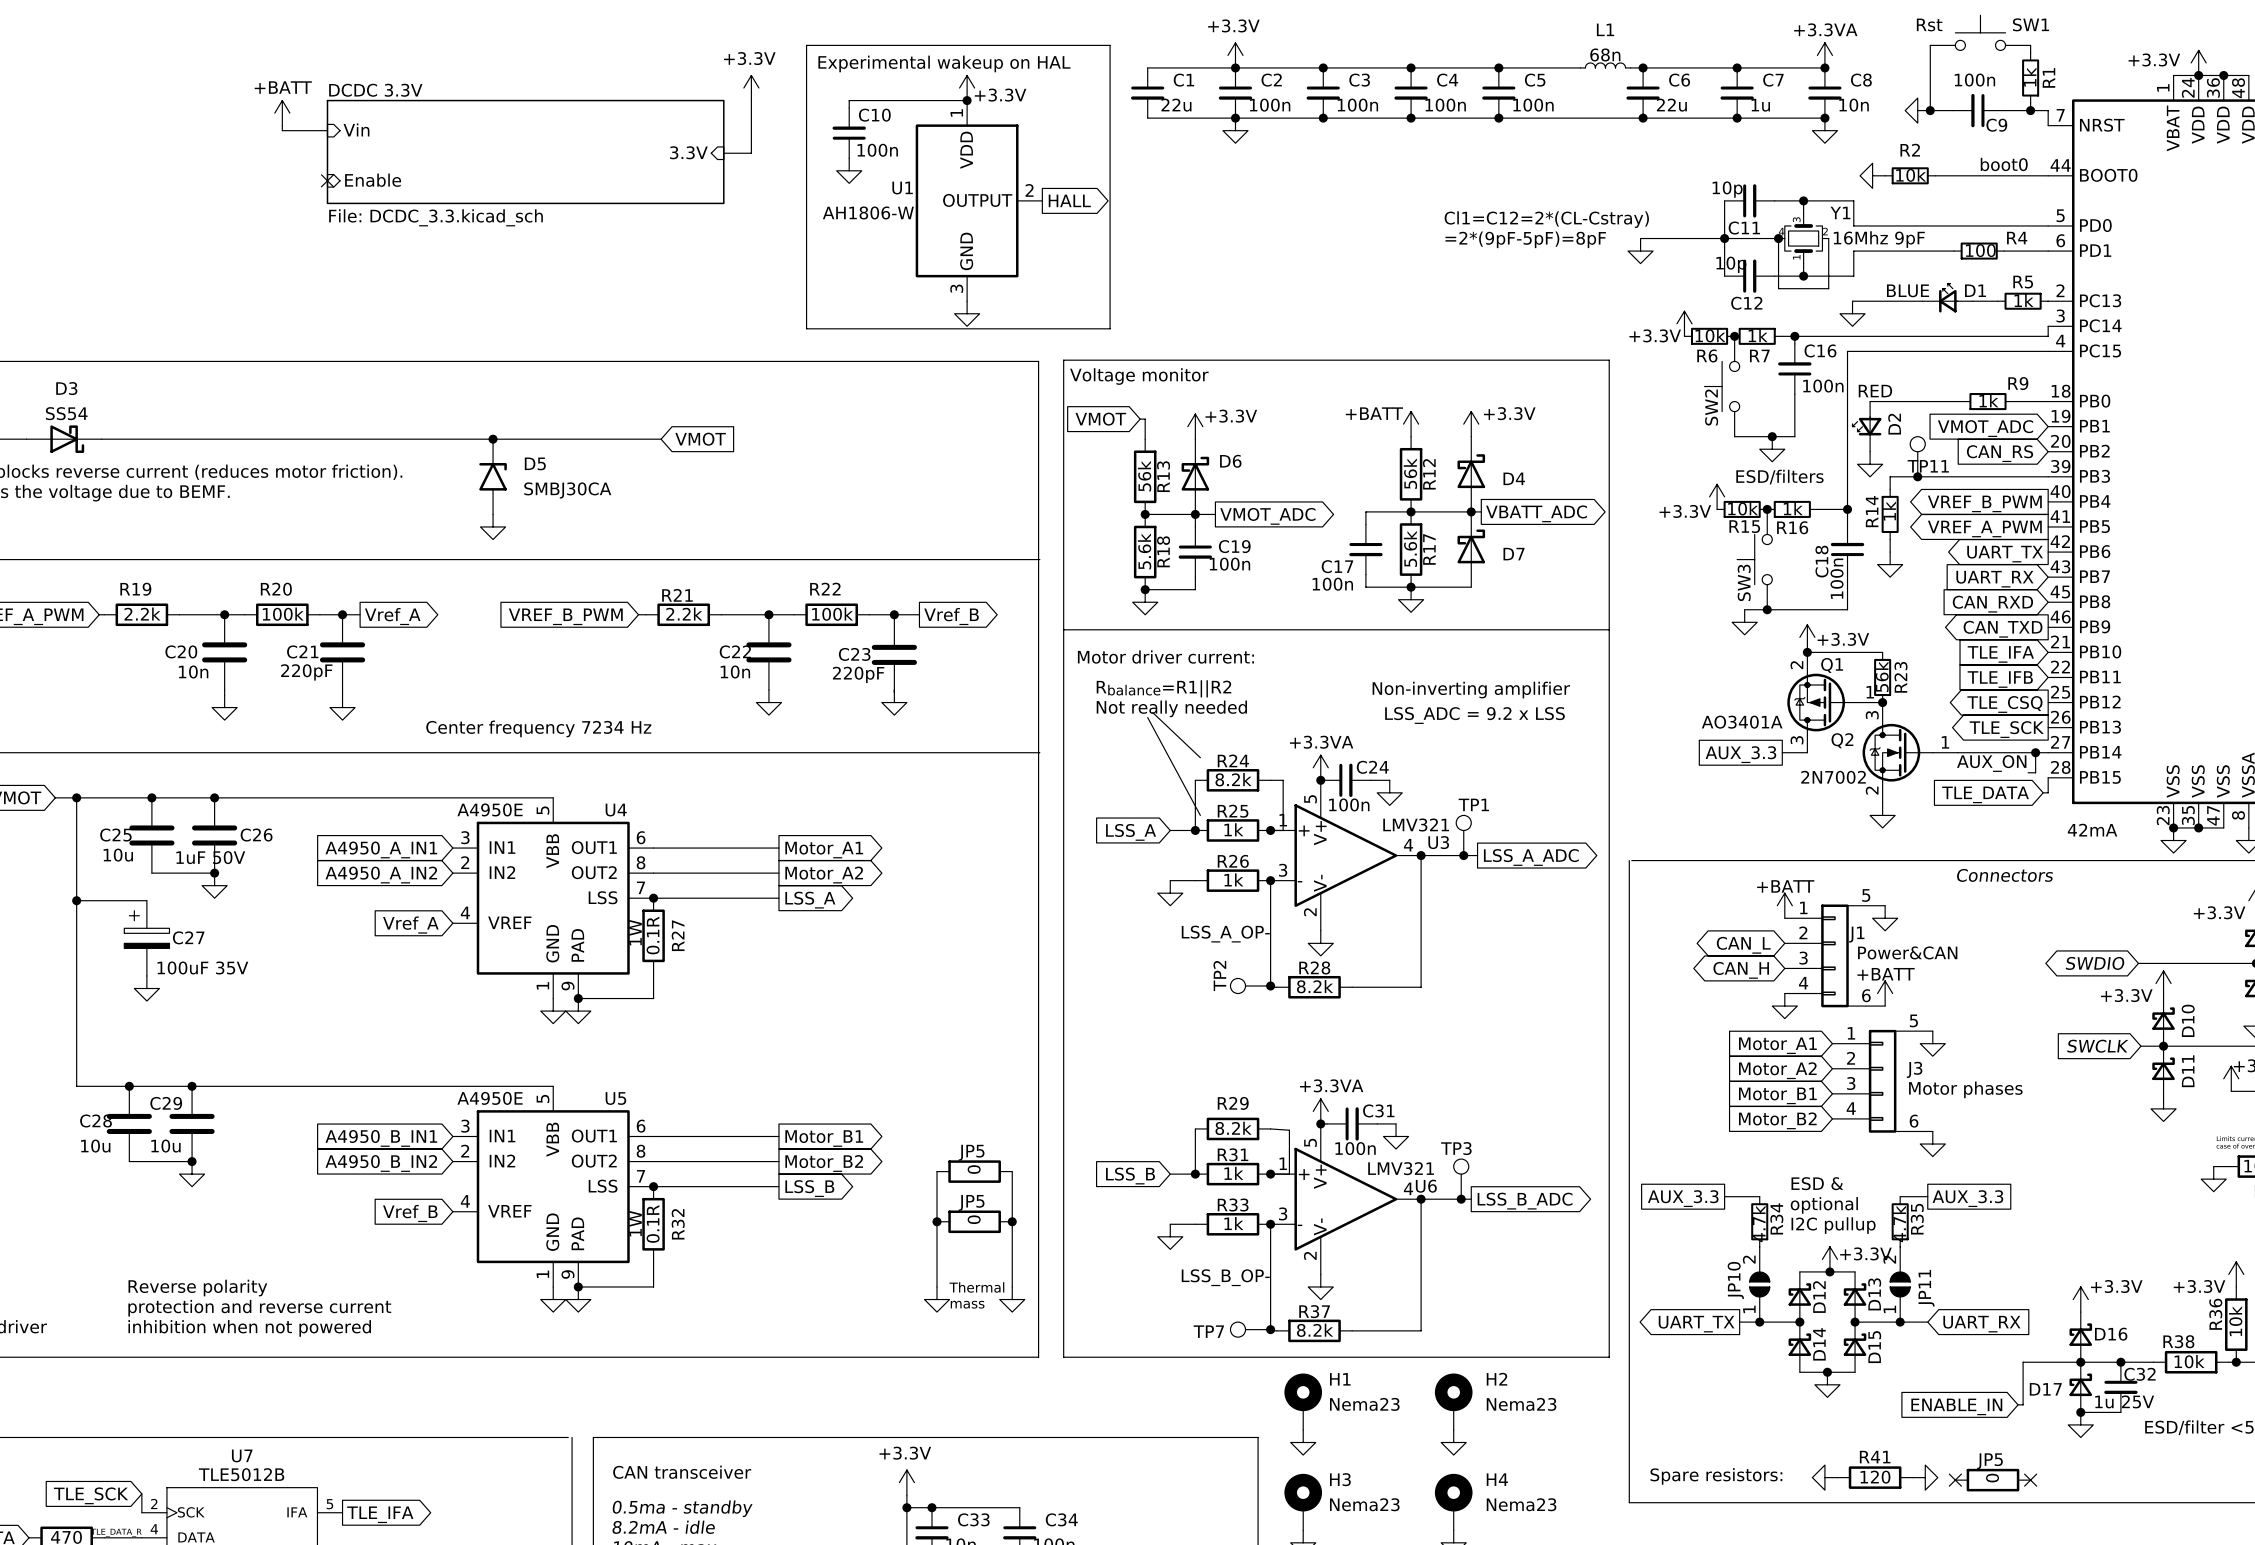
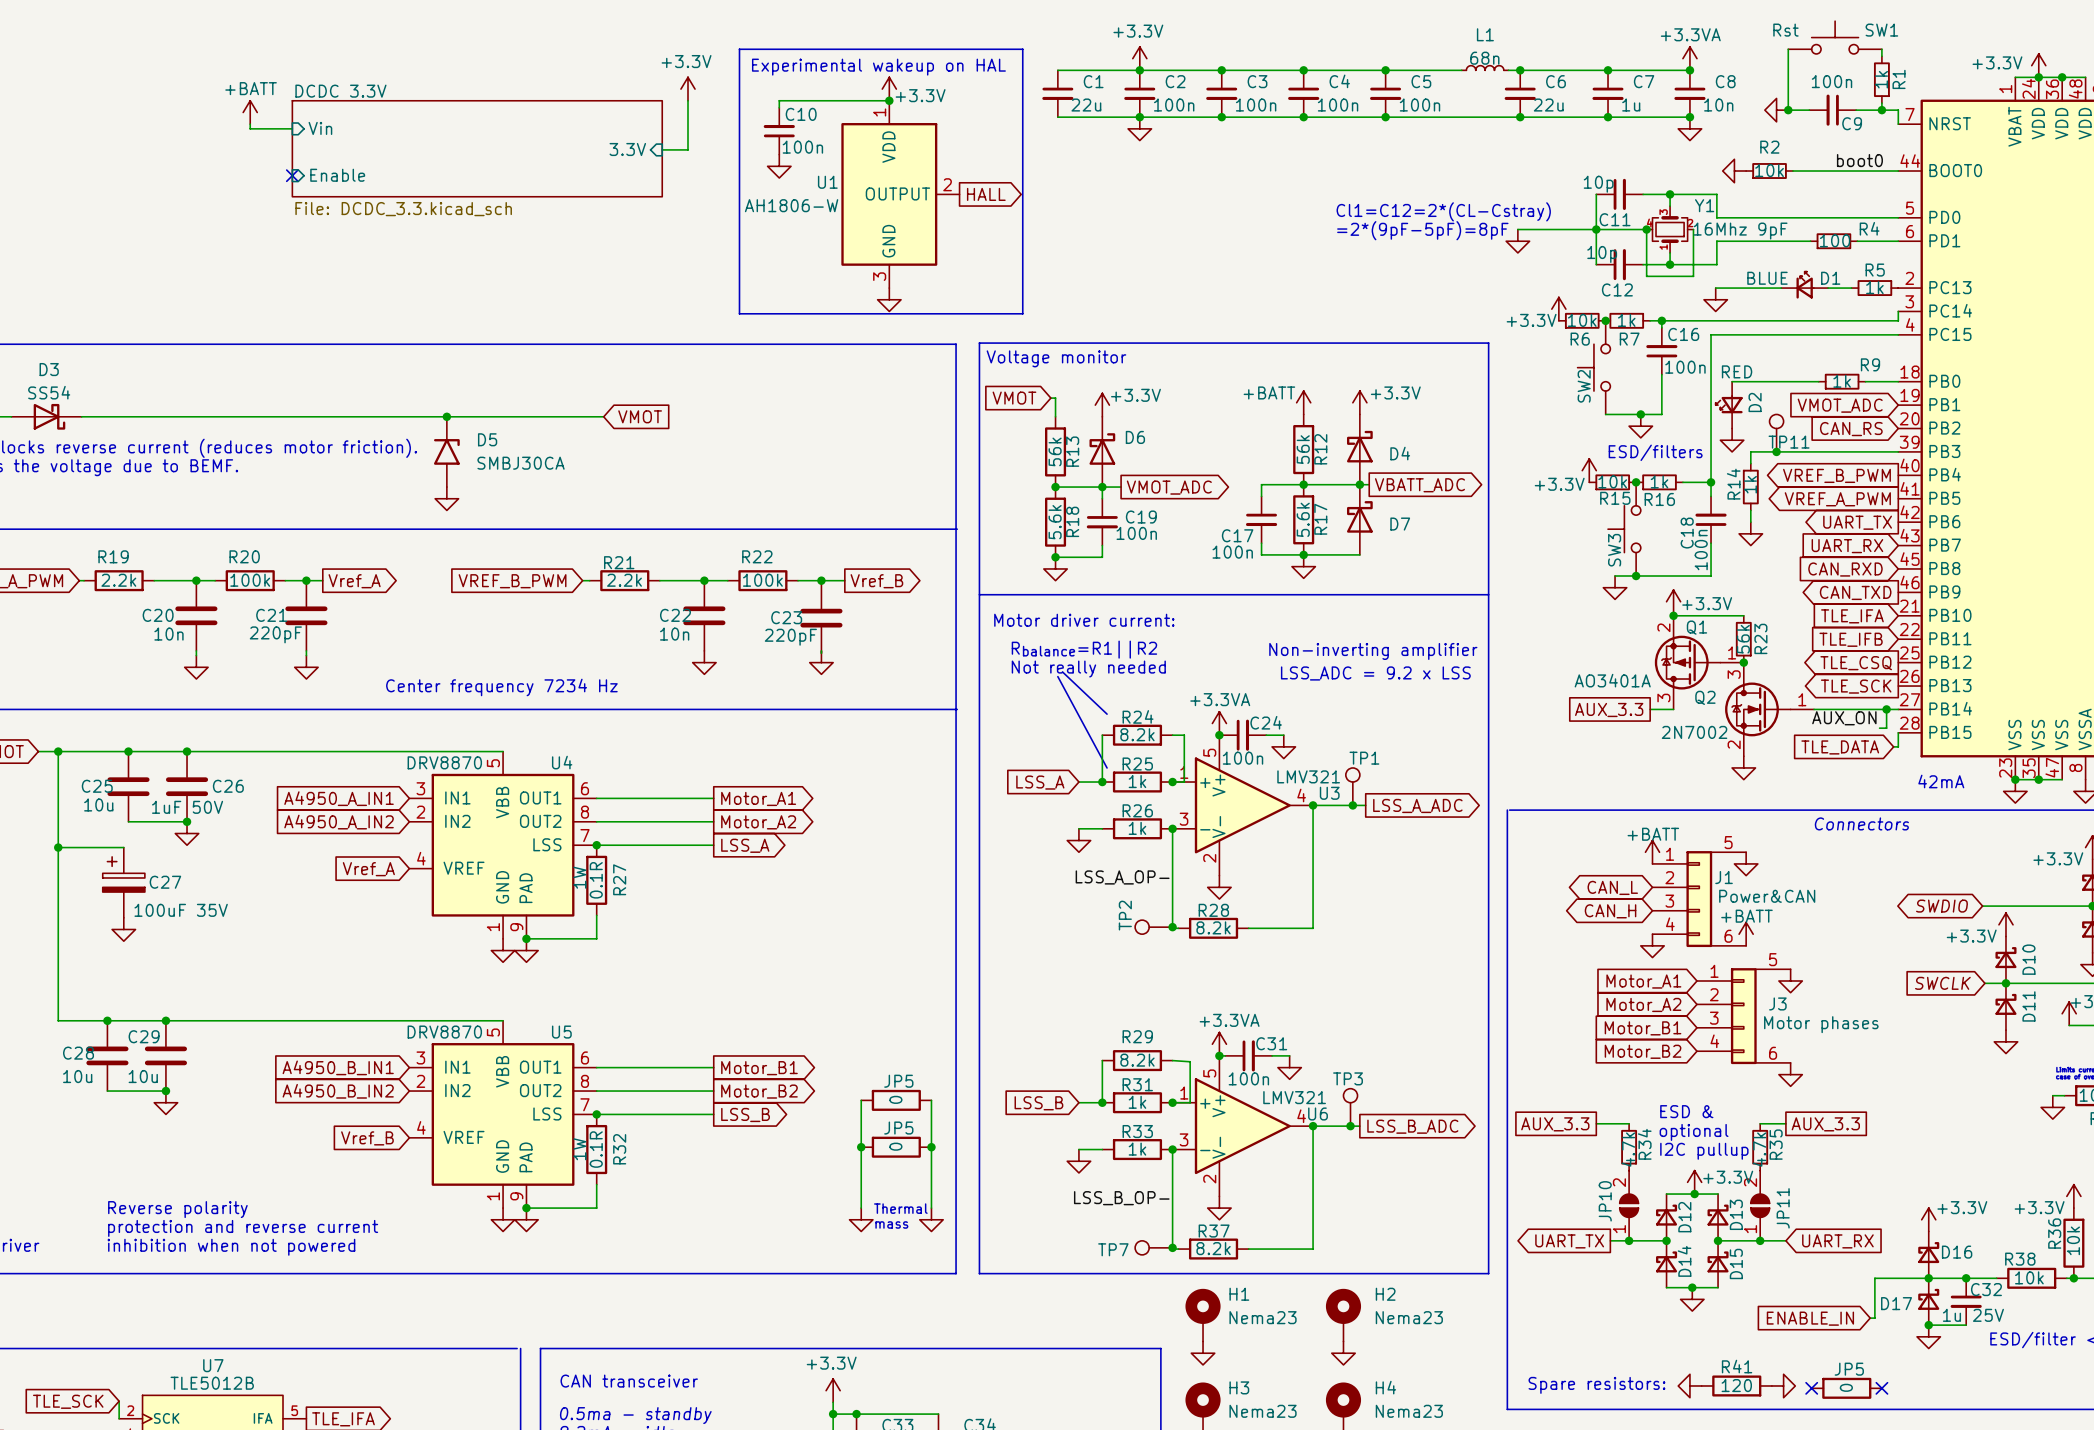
U4 value: A4950E (490, 809) -> DRV8870 (444, 762)
U5 value: A4950E (490, 1098) -> DRV8870 (444, 1032)

